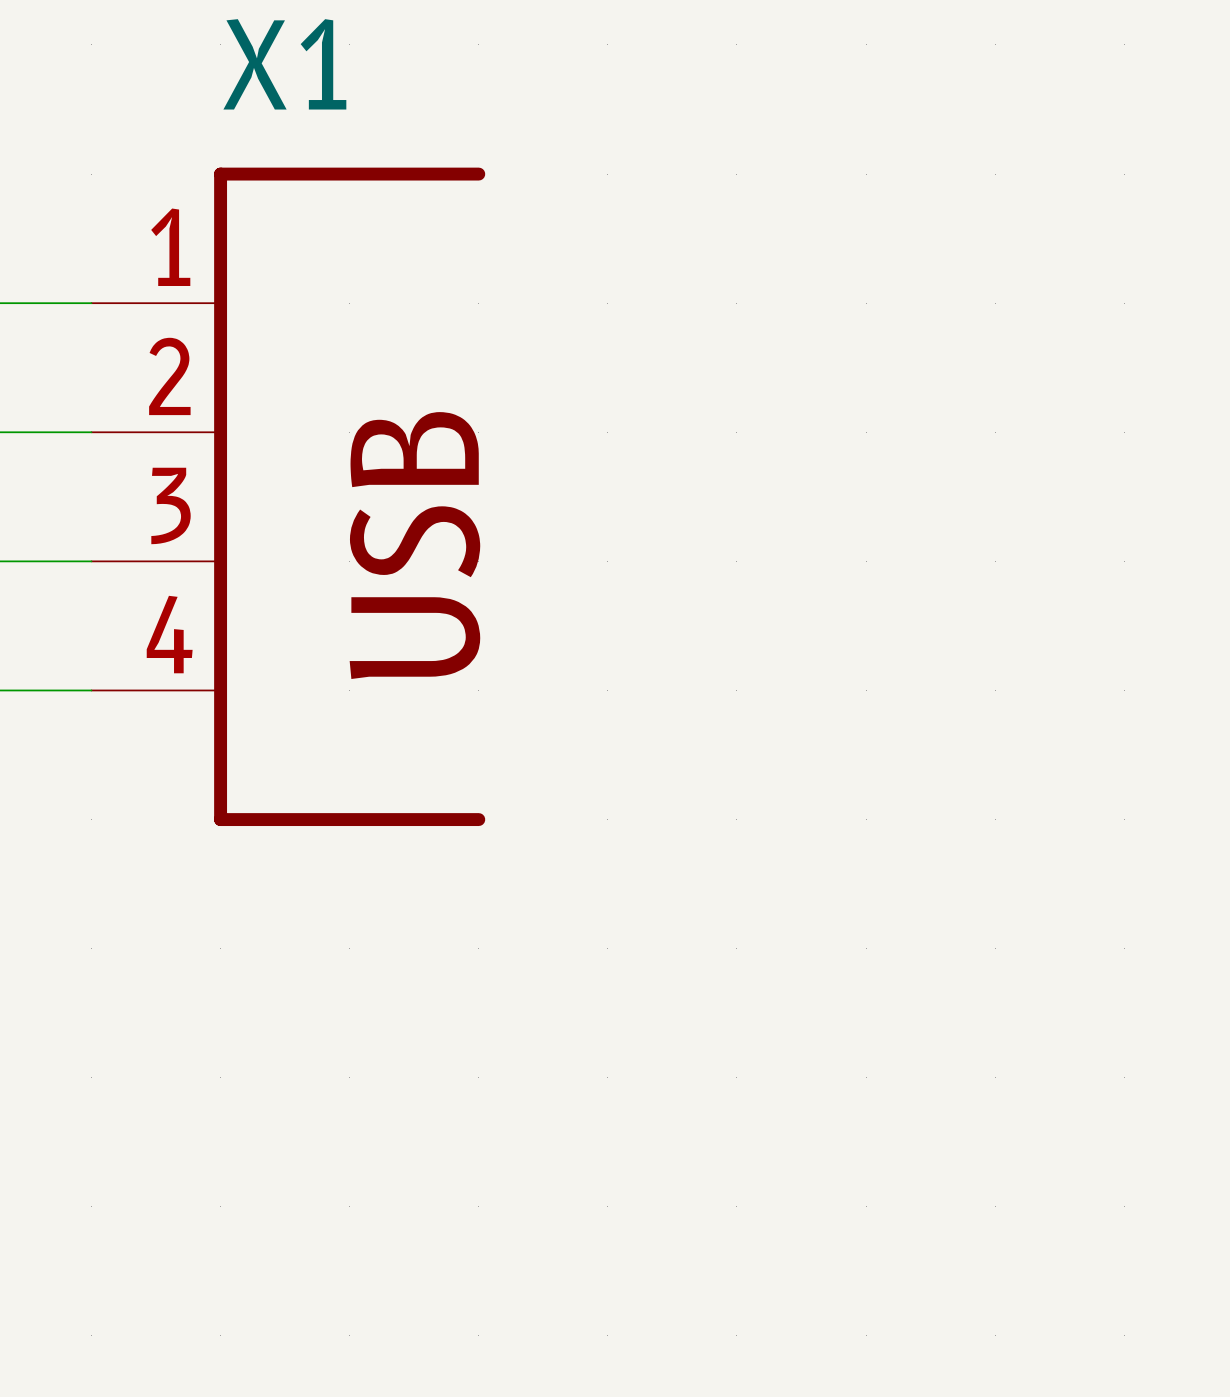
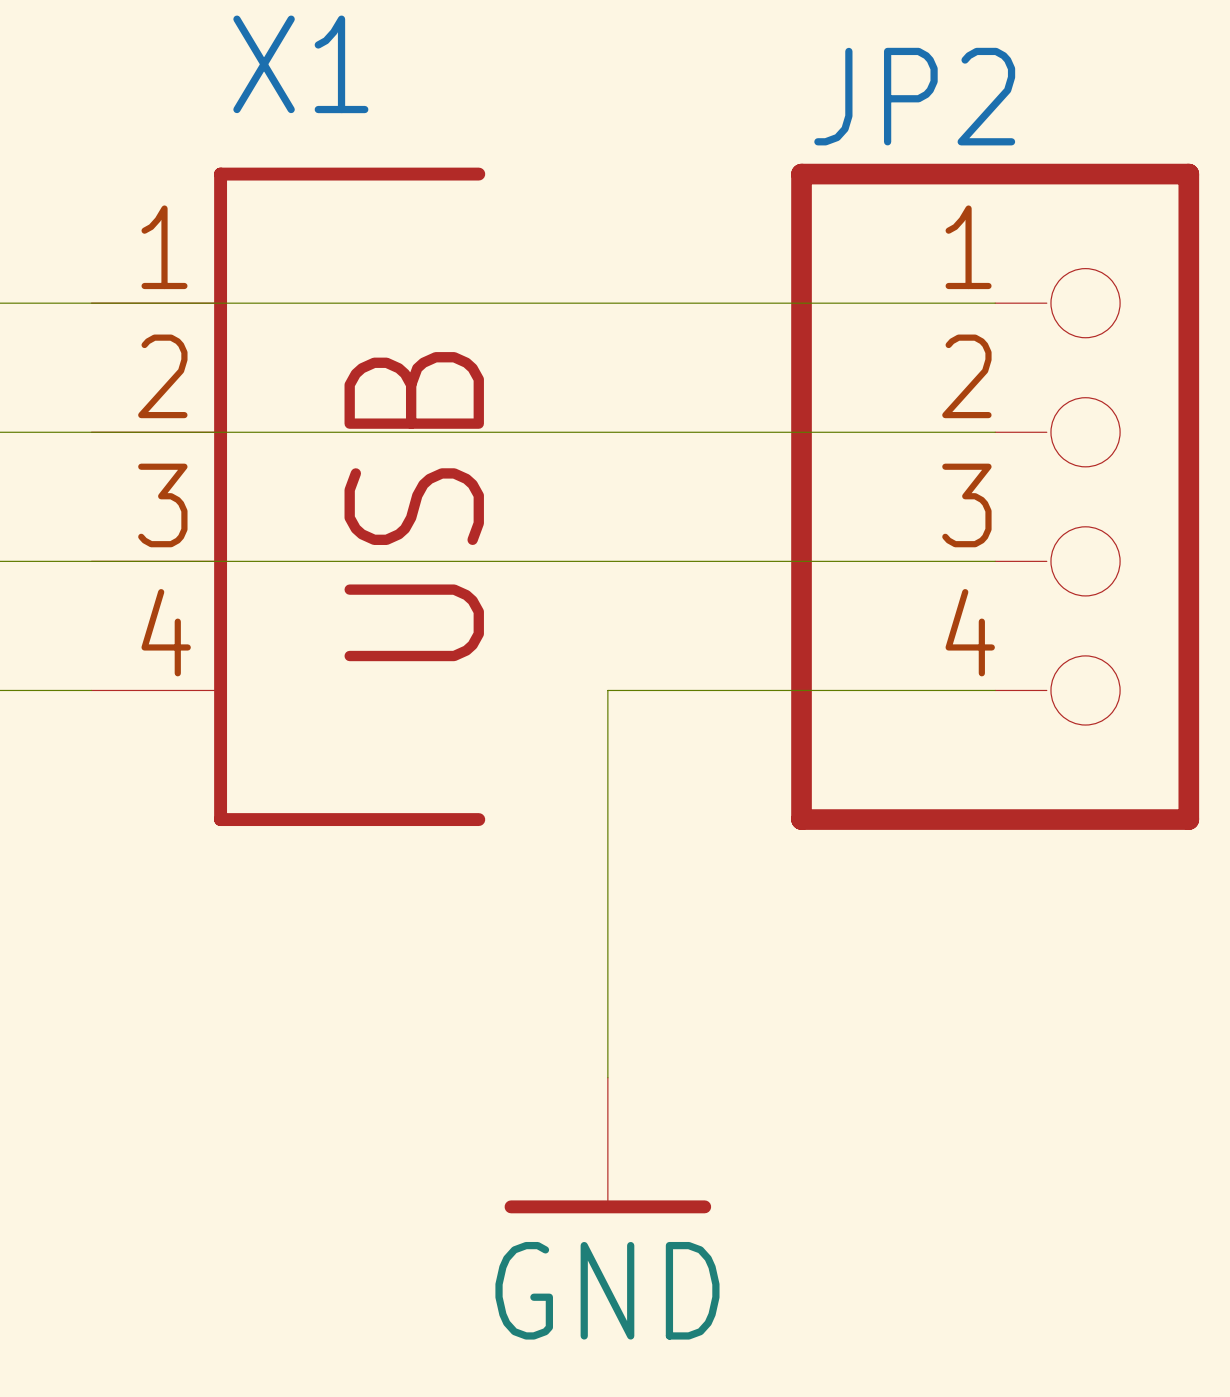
wire: none -> (91, 303) (995, 303)
wire: none -> (91, 432) (995, 432)
JP2: none -> (995, 496)
wire: none -> (91, 561) (995, 561)
wire: none -> (995, 690) (607, 690) (607, 1077)
power symbol: none -> GND (607, 1145)

